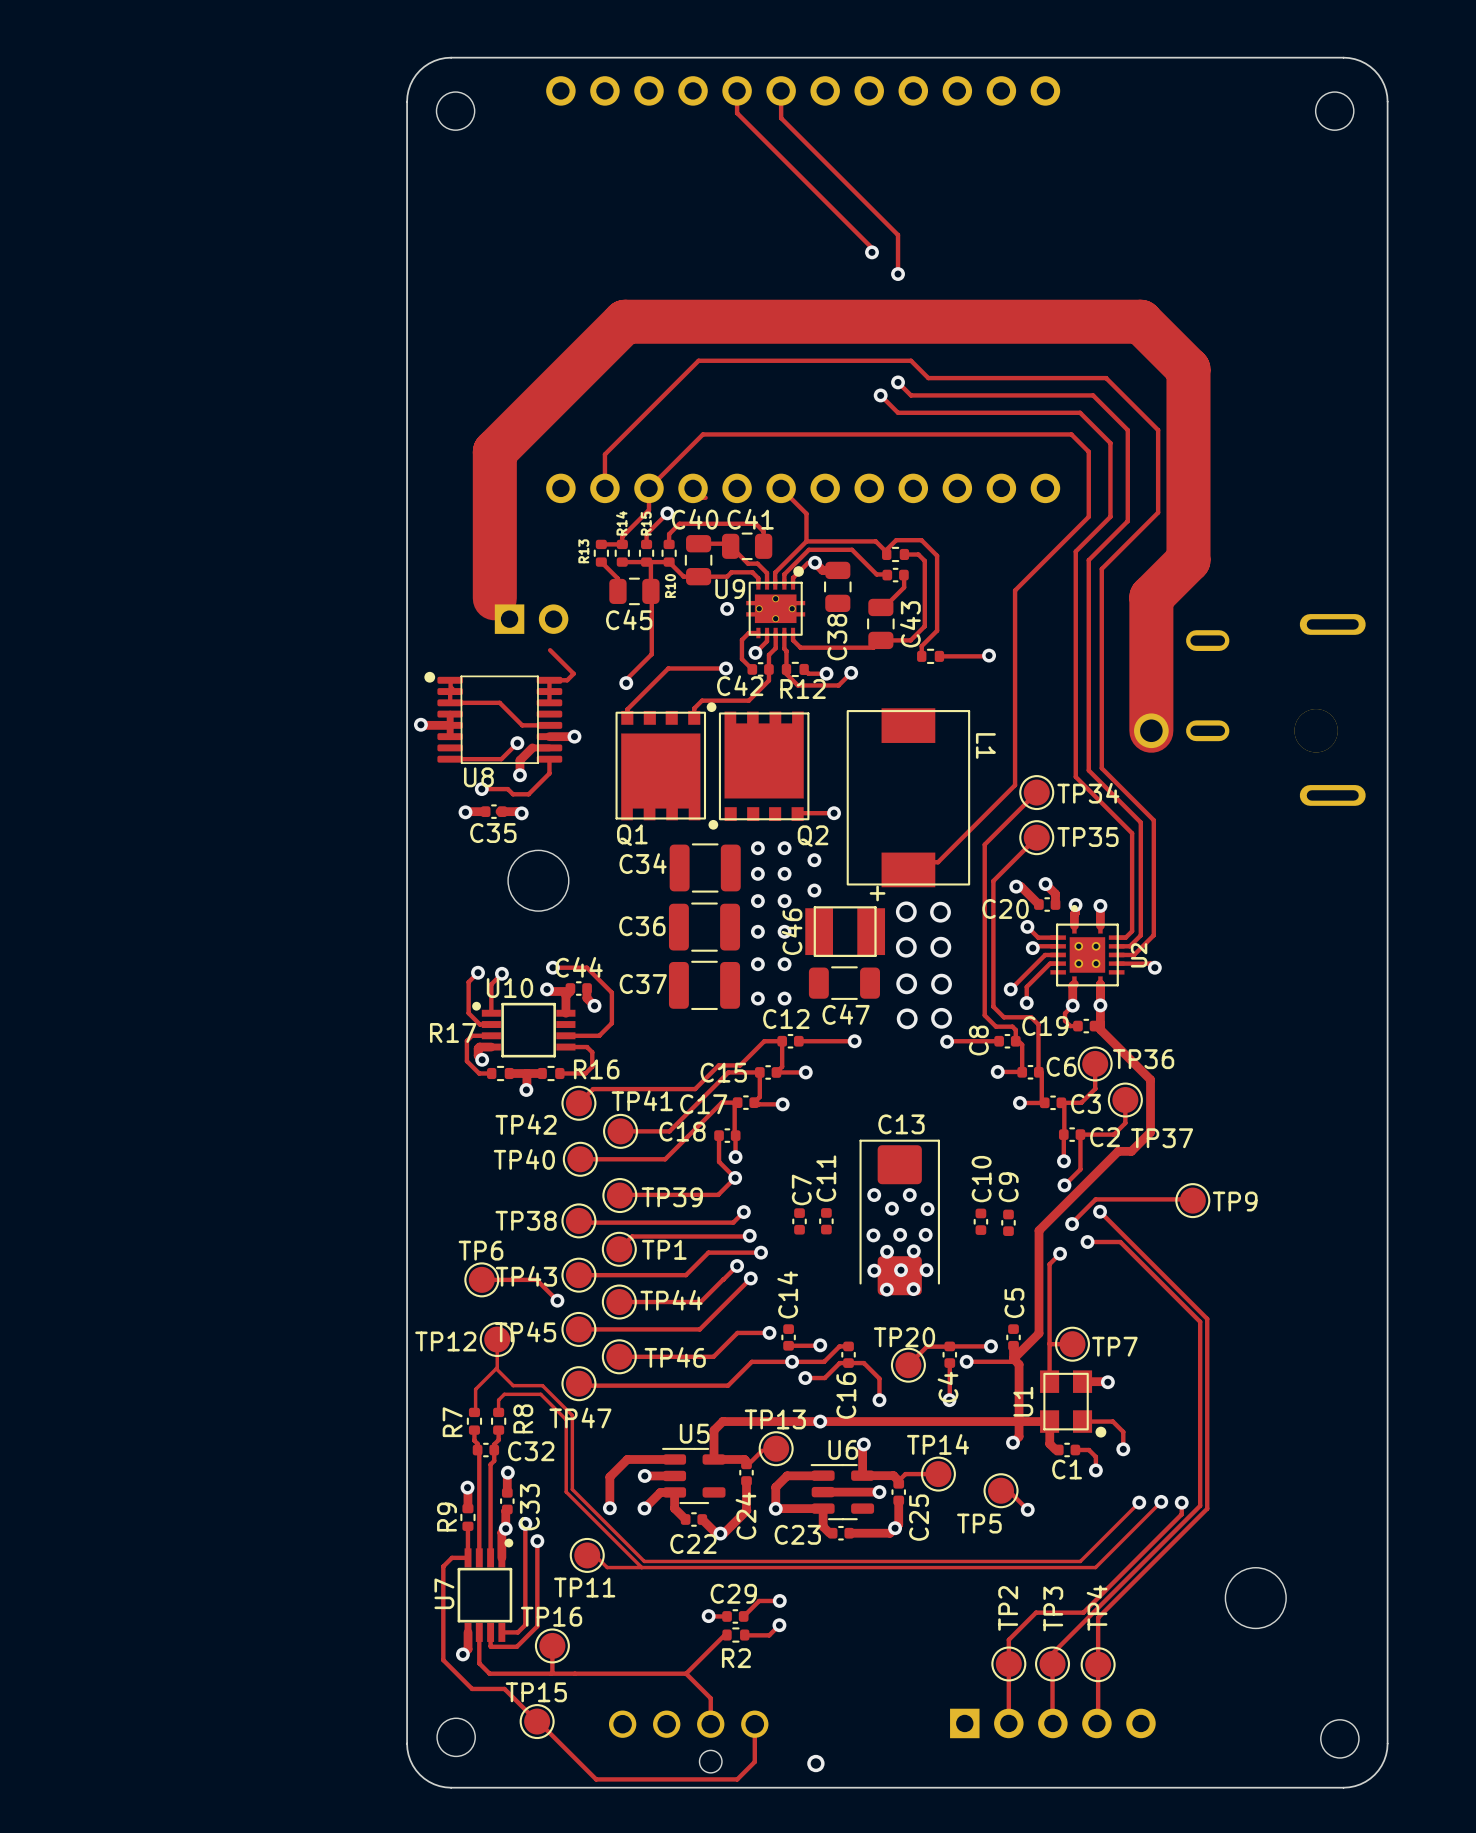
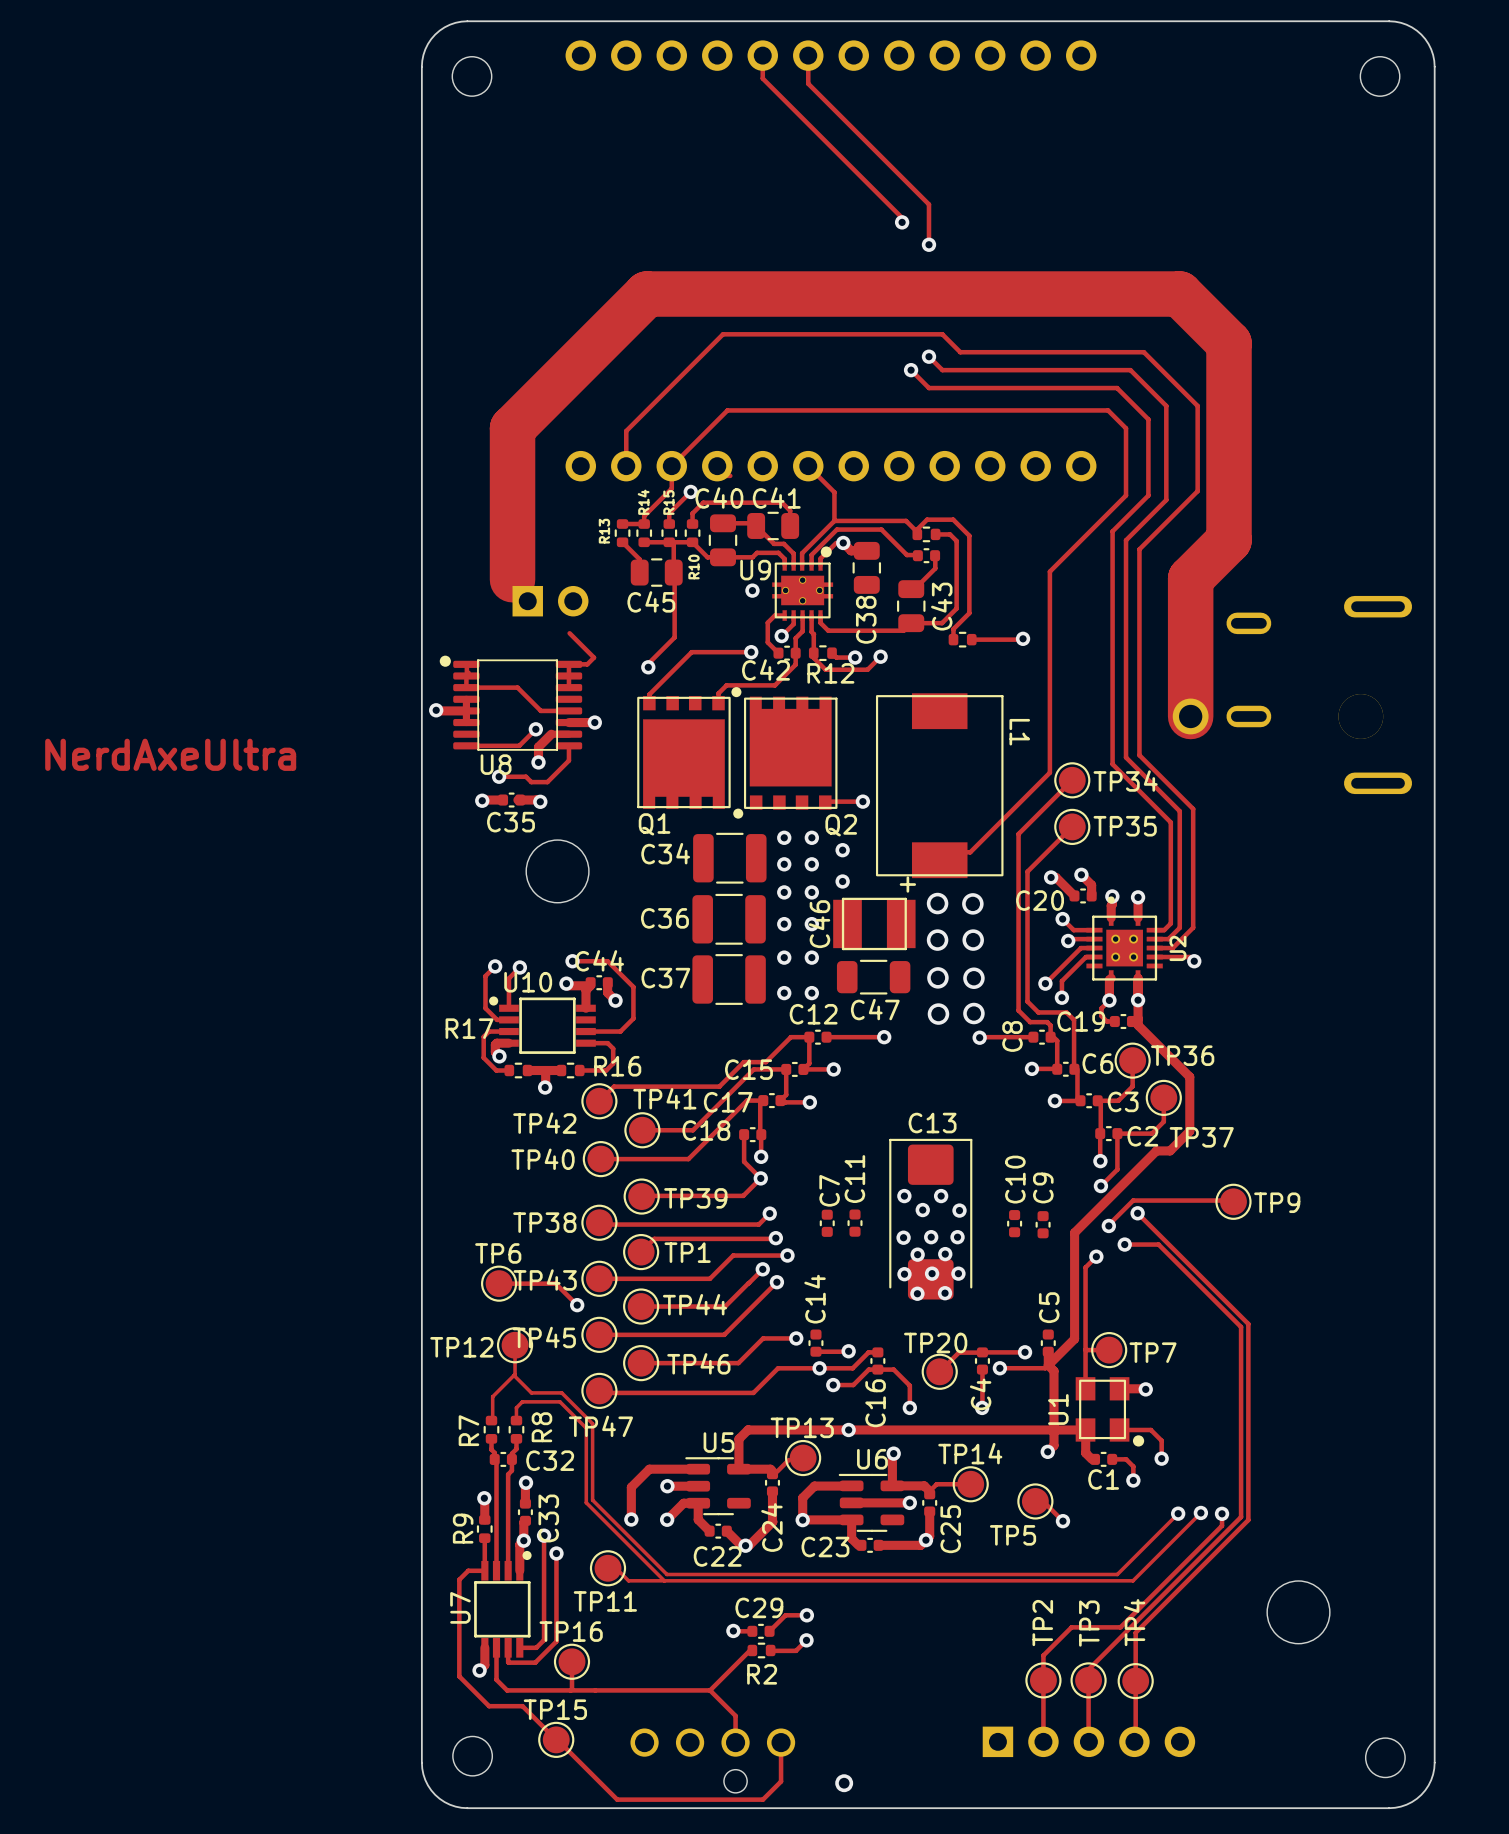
text: none -> NerdAxeUltra (170, 754)

